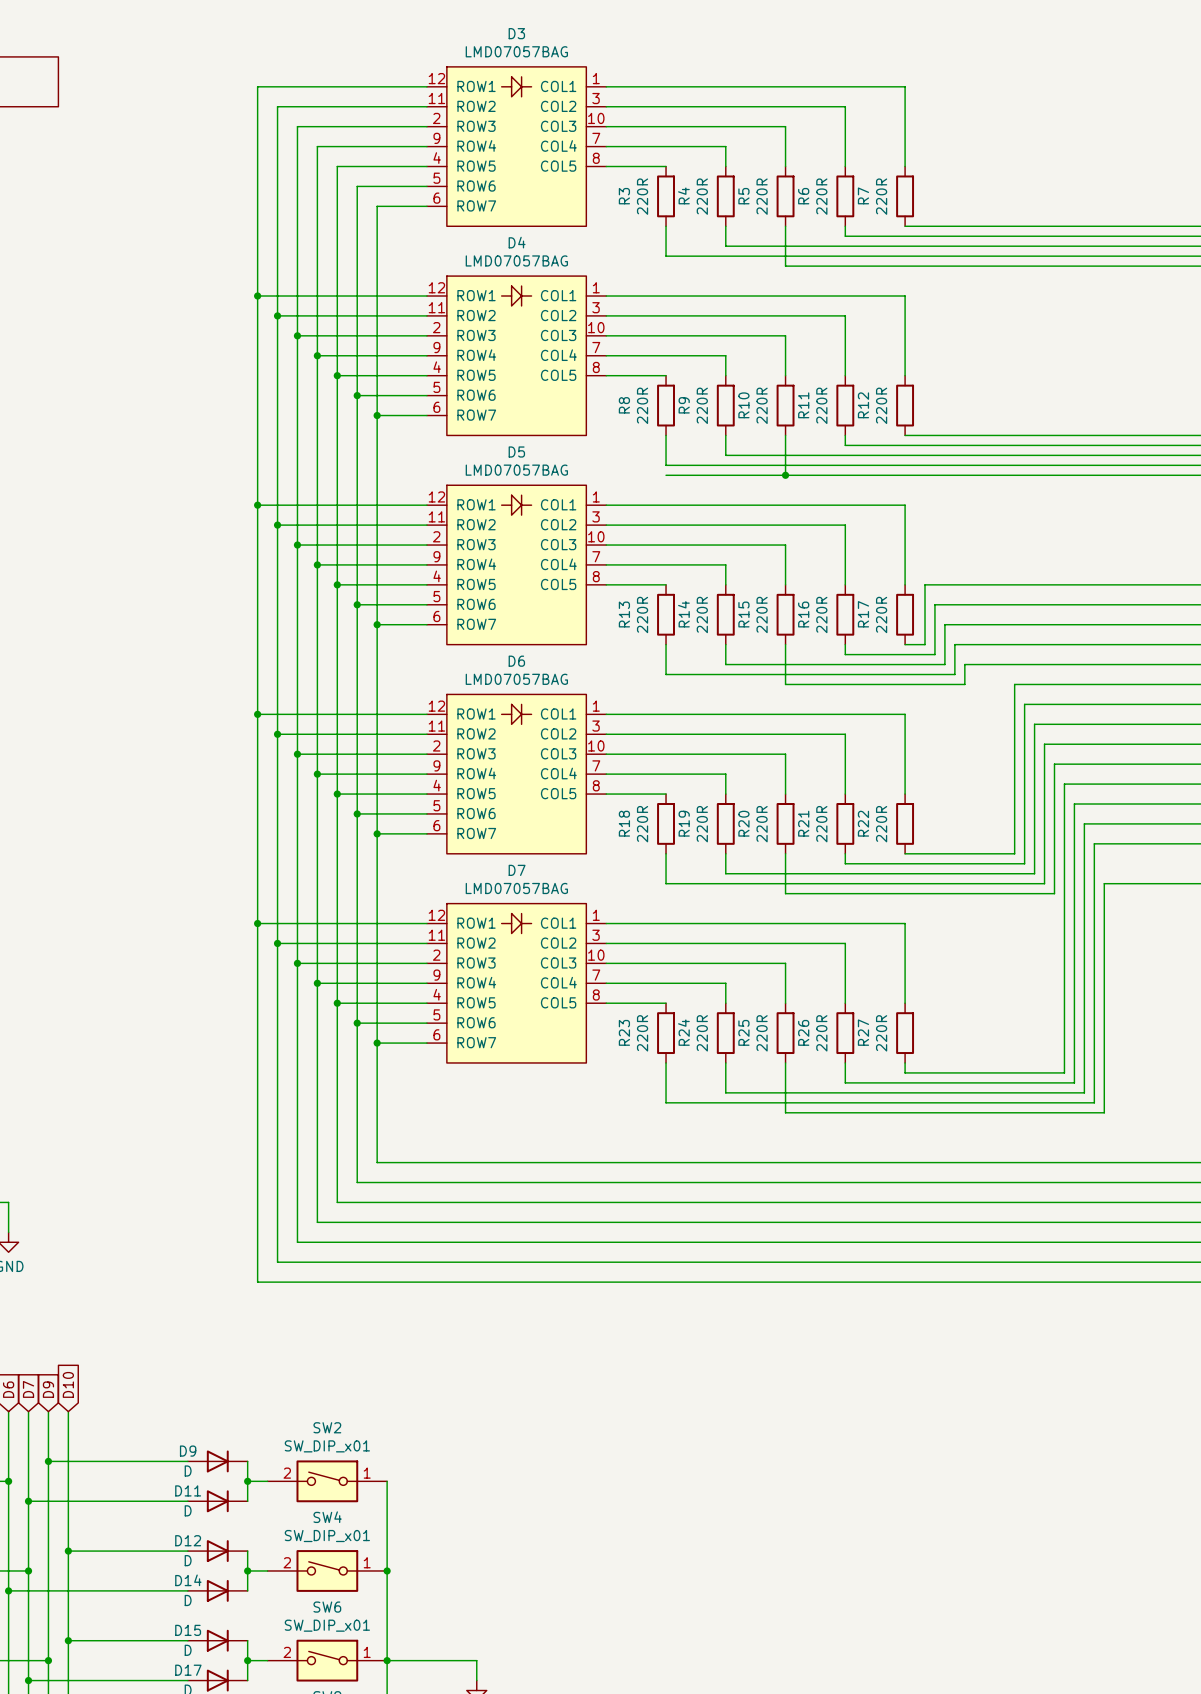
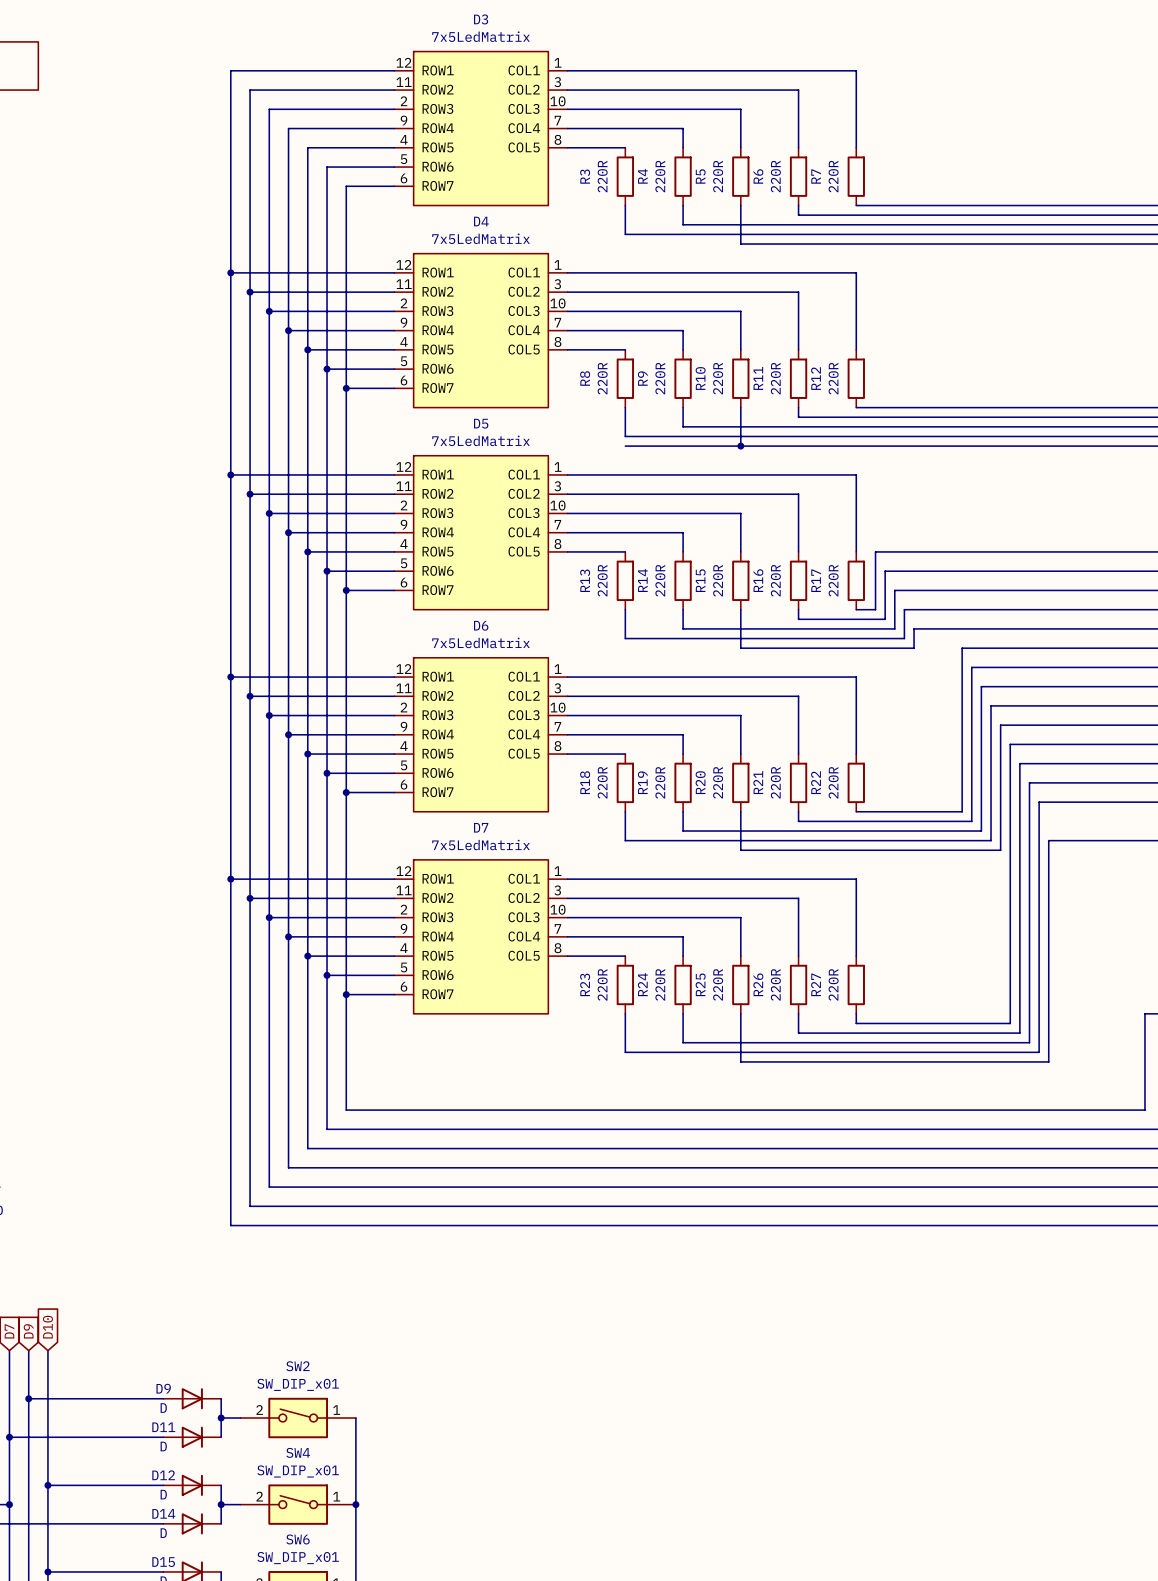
D3 value: LMD07057BAG (516, 51) -> 7x5LedMatrix (481, 36)
D3 symbol: [426, 66, 607, 227] -> [394, 51, 568, 206]
D4 value: LMD07057BAG (516, 260) -> 7x5LedMatrix (481, 238)
D4 symbol: [426, 276, 607, 436] -> [394, 253, 568, 408]
D5 value: LMD07057BAG (516, 470) -> 7x5LedMatrix (481, 440)
D5 symbol: [426, 485, 607, 645] -> [394, 455, 568, 610]
D6 value: LMD07057BAG (516, 679) -> 7x5LedMatrix (481, 642)
D6 symbol: [426, 694, 607, 854] -> [394, 657, 568, 812]
D7 value: LMD07057BAG (516, 888) -> 7x5LedMatrix (481, 845)
D7 symbol: [426, 903, 607, 1063] -> [394, 859, 568, 1014]

